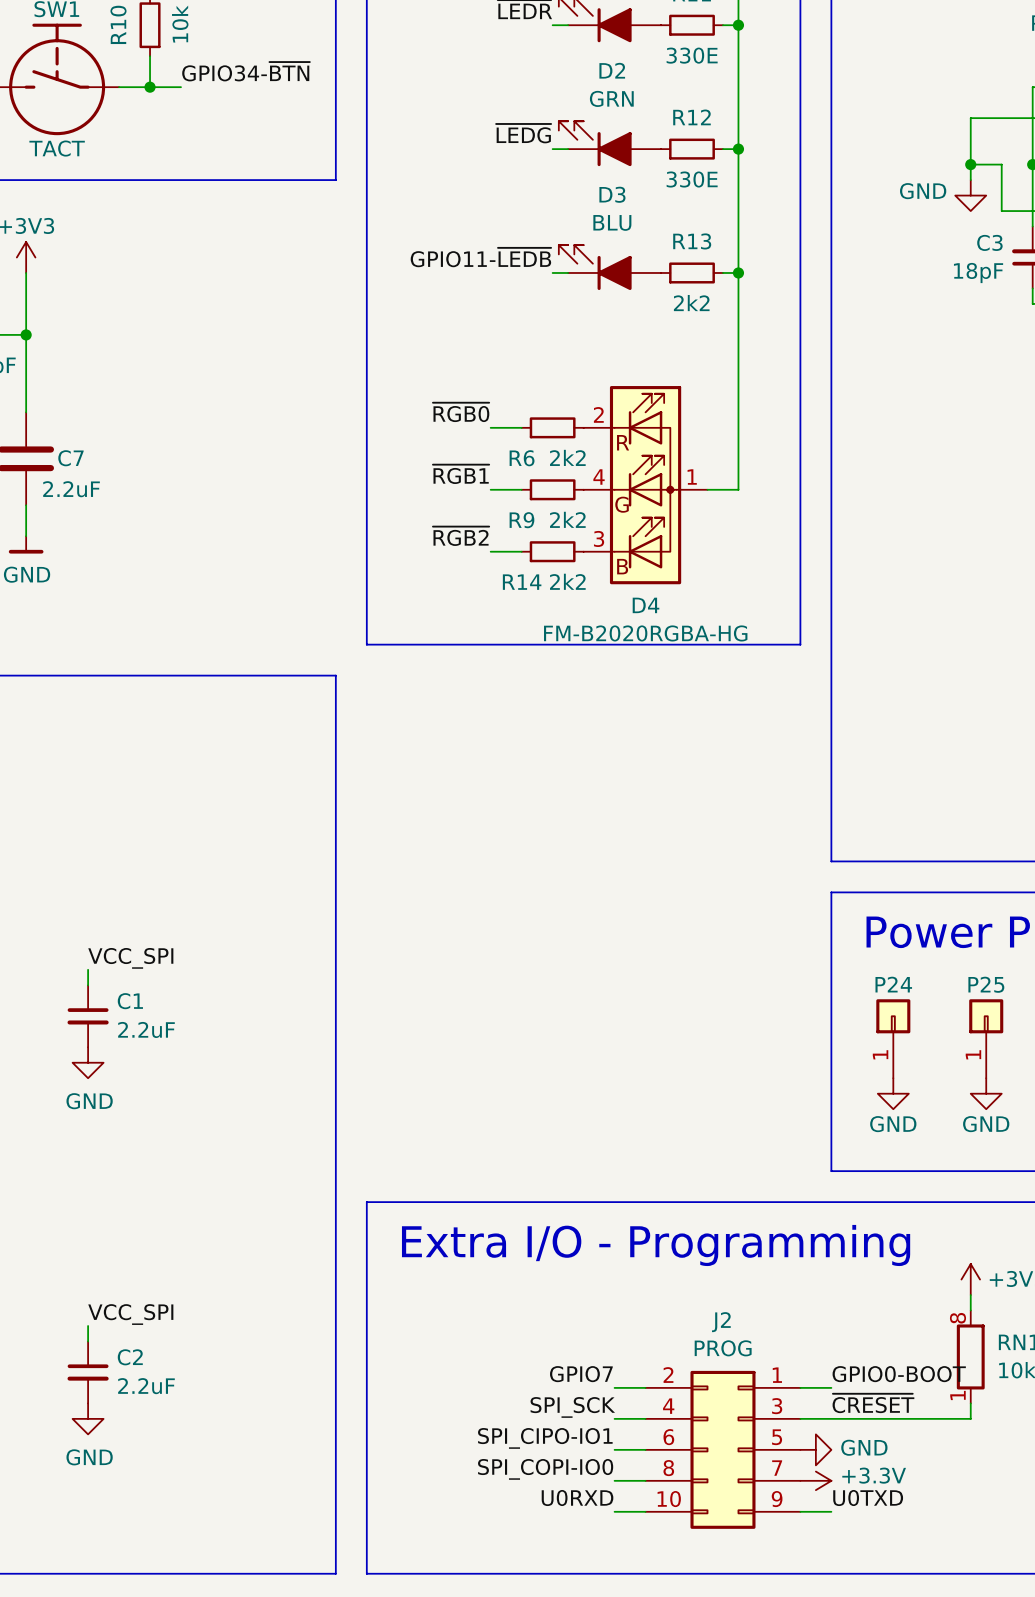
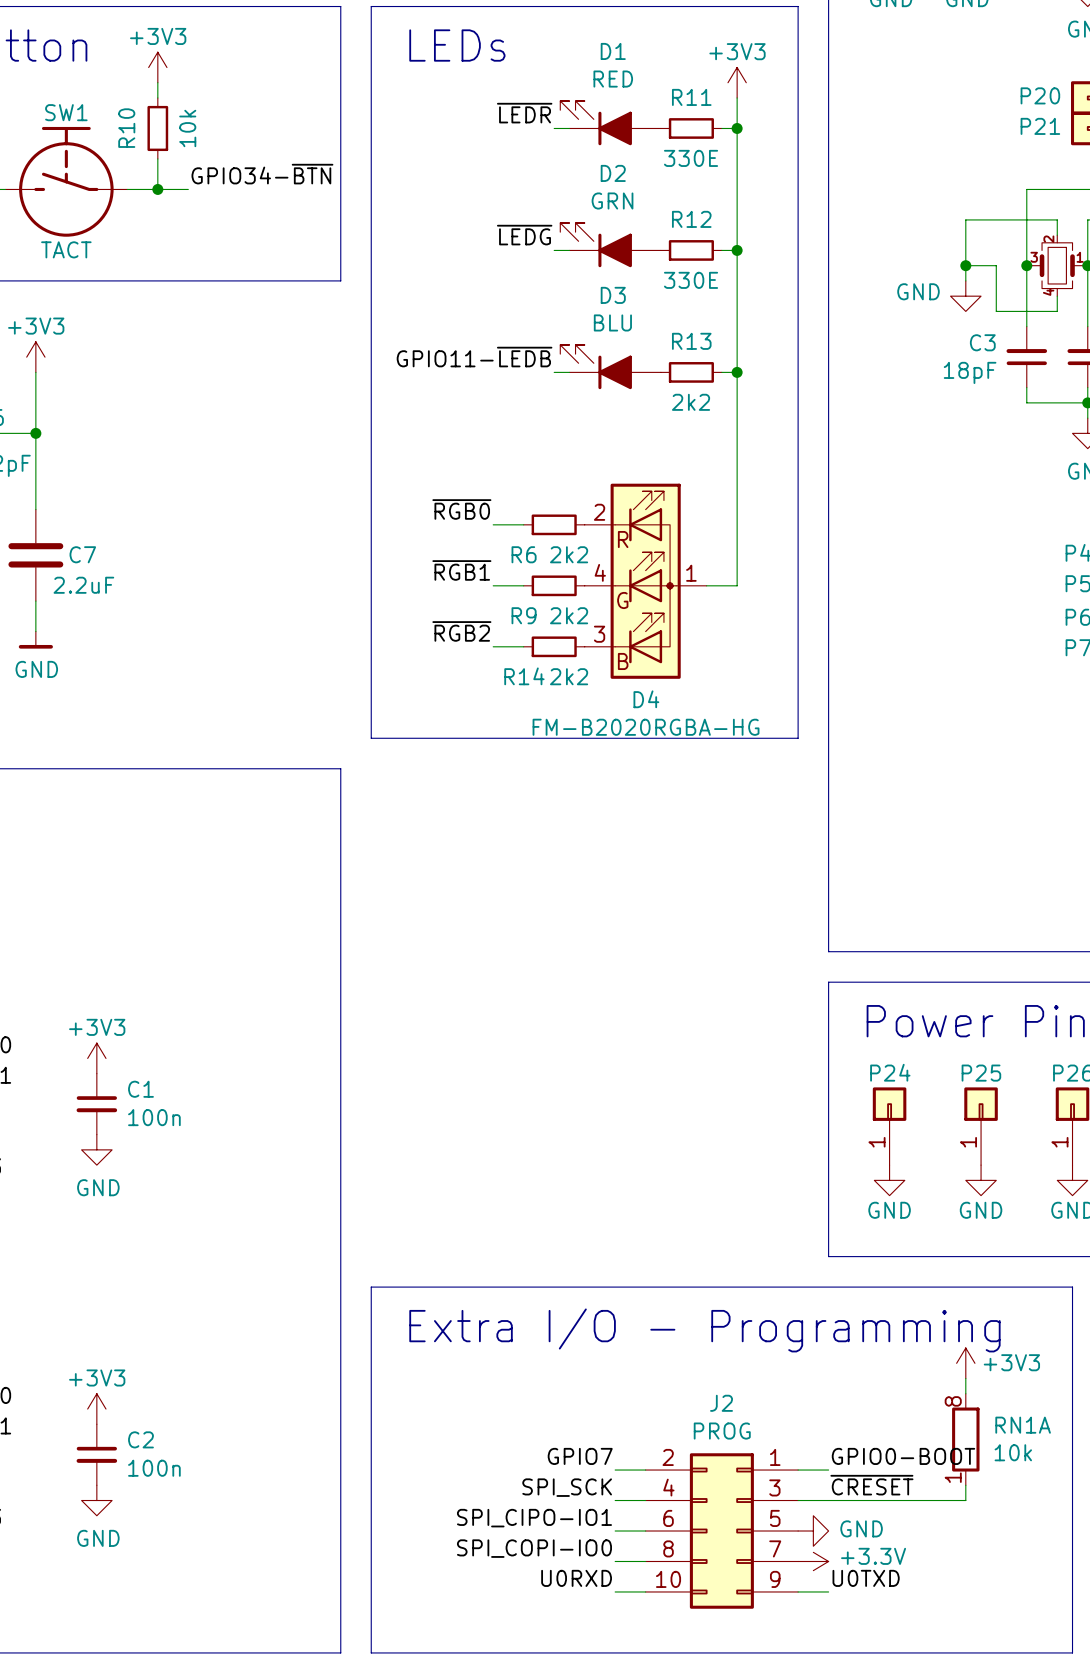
label: VCC_SPI (130, 958) -> none
power symbol: none -> +3V3 (96, 1058)
C1 value: 2.2uF (146, 1029) -> 100n (154, 1117)
label: VCC_SPI (130, 1314) -> none
power symbol: none -> +3V3 (96, 1409)
C2 value: 2.2uF (146, 1386) -> 100n (154, 1468)

